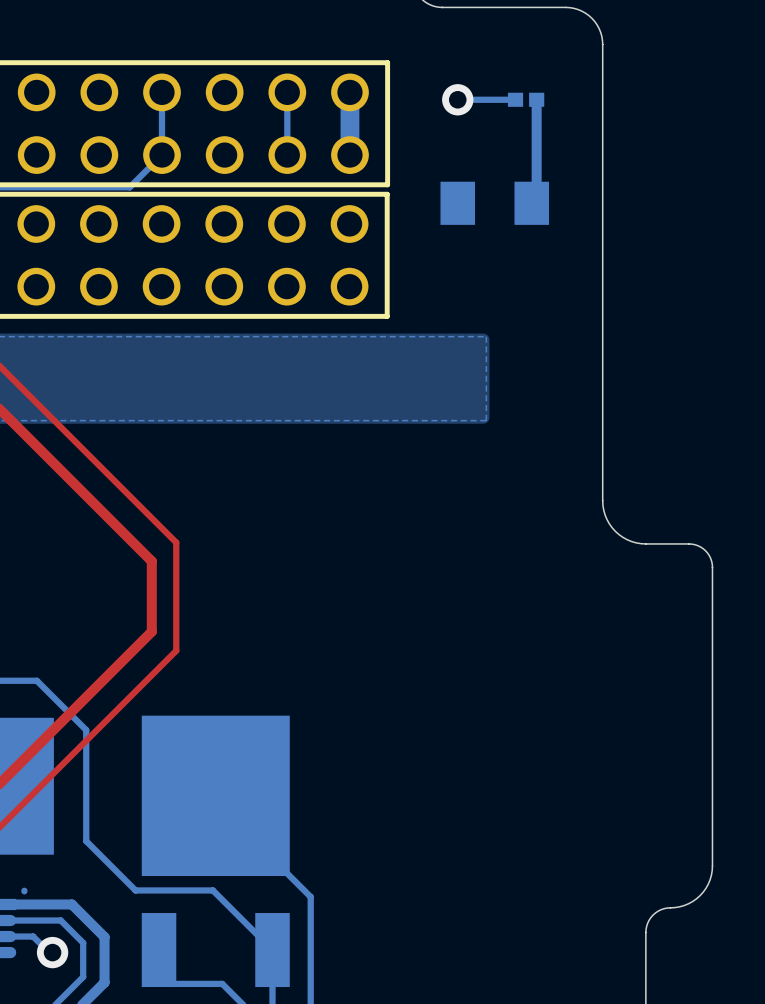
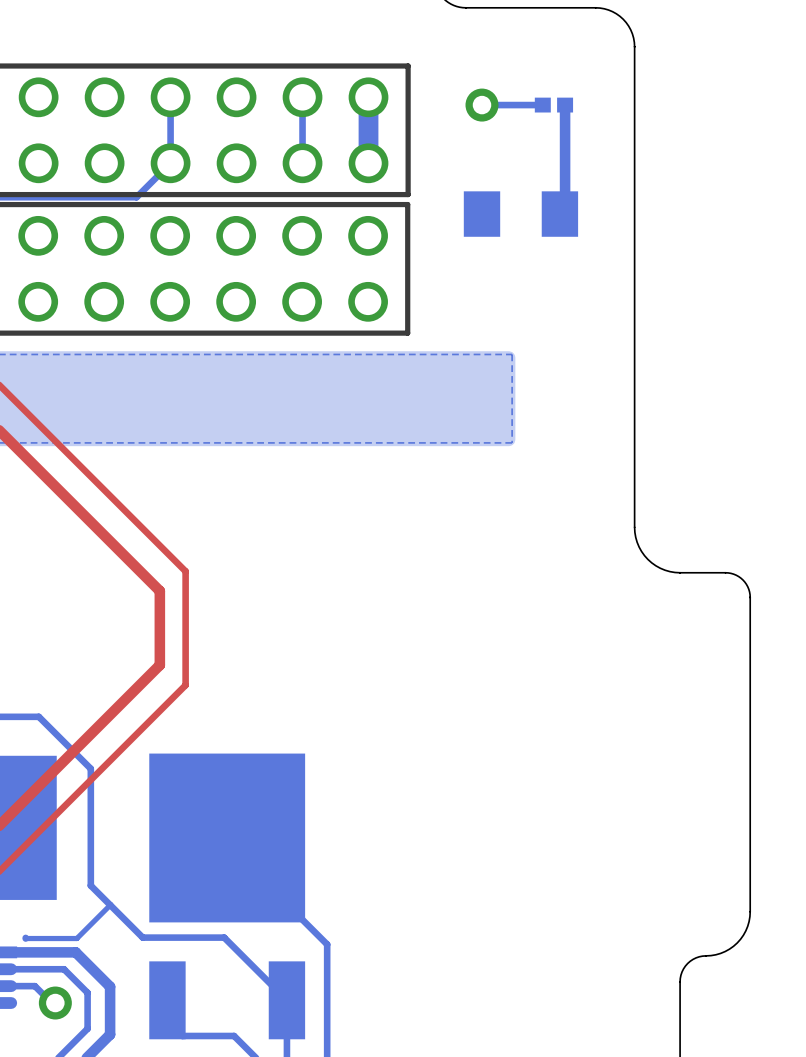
bottom track: none -> (110, 905) (76, 938) (25, 938)

